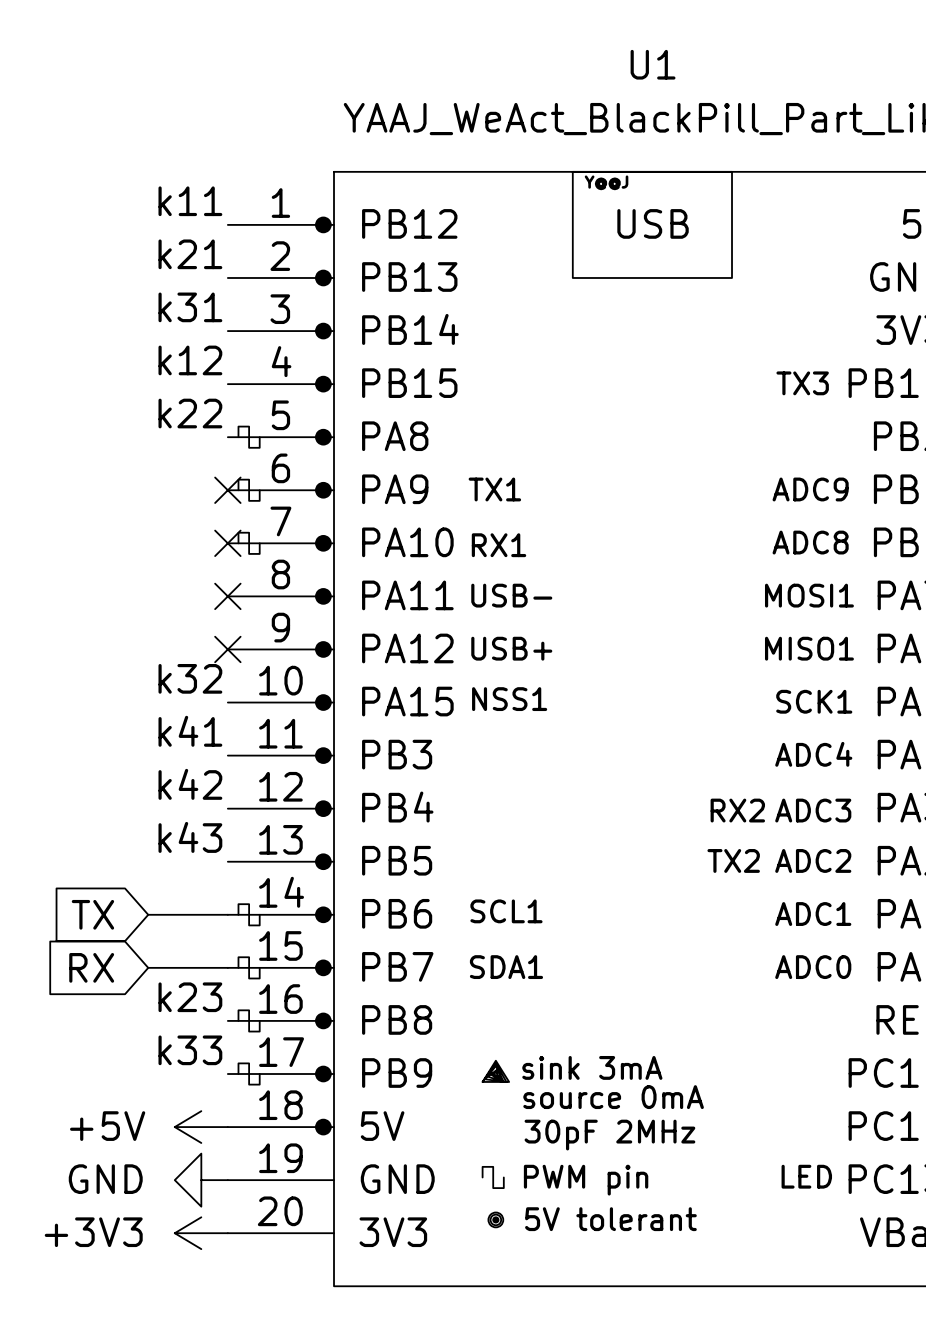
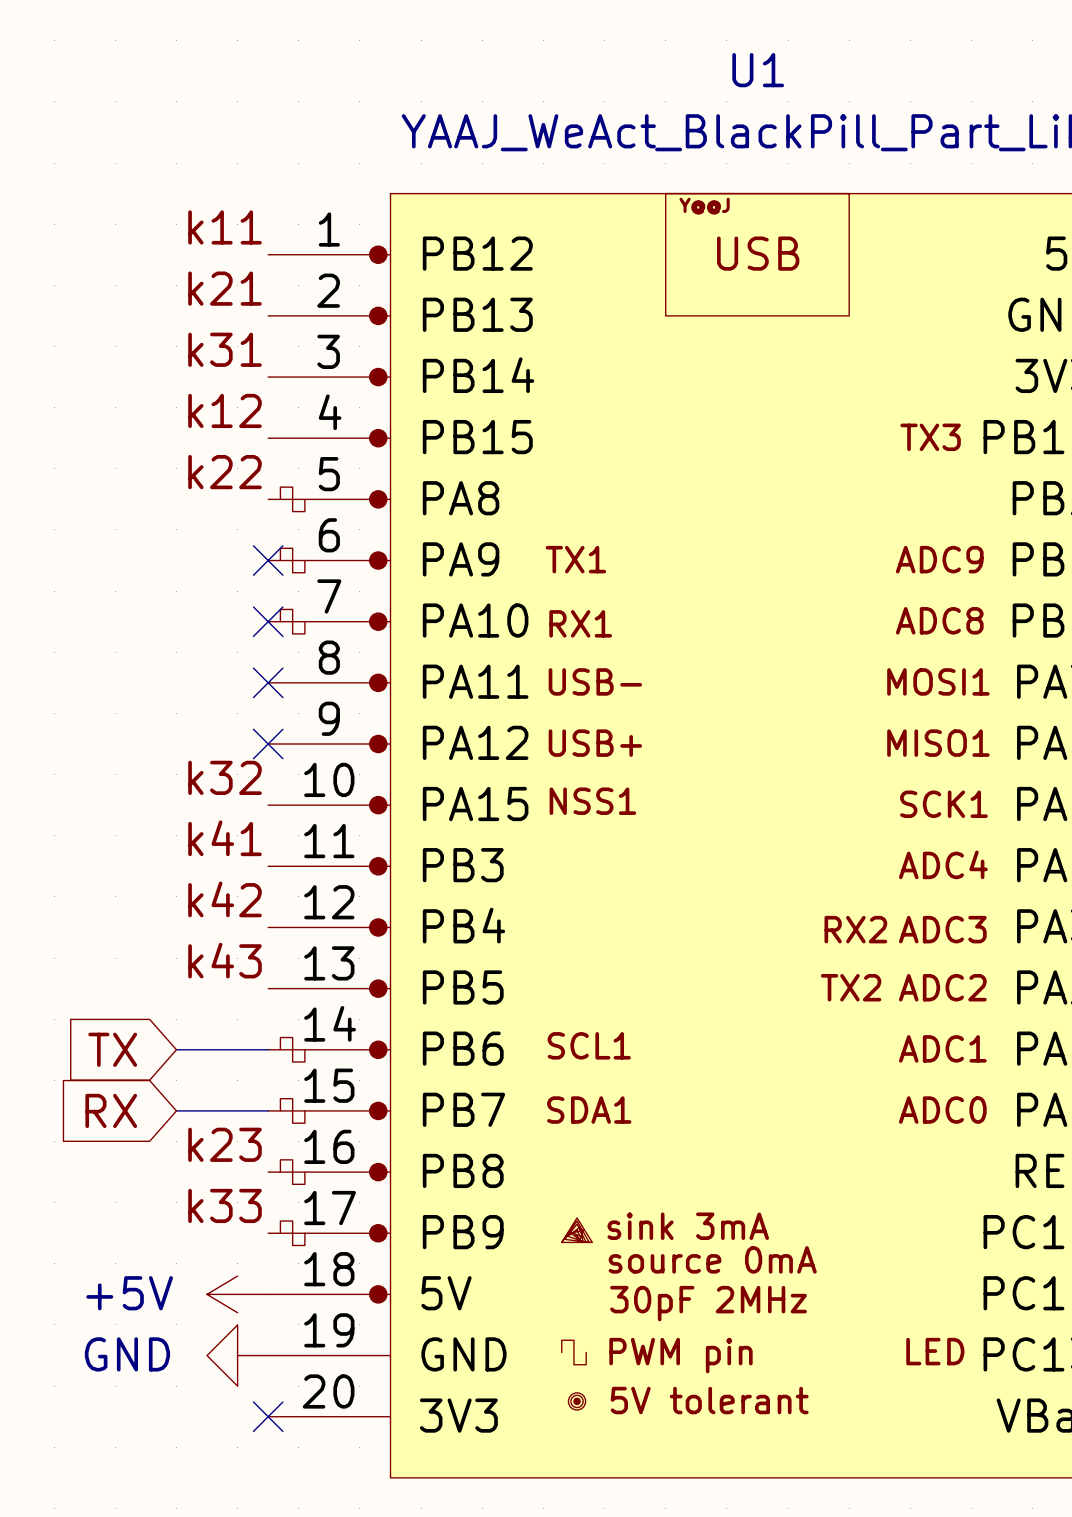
power symbol: +3V3 (201, 1233) -> none
no-connect mark: none -> (268, 1416)

